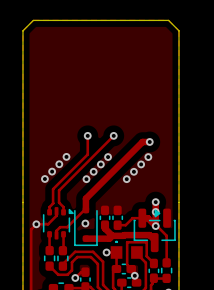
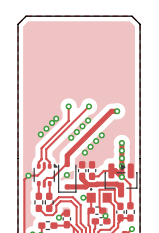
via: none -> (56, 118)
via: none -> (88, 120)
via: (108, 157) -> none
via: (148, 157) -> none
via: none -> (82, 126)
via: (100, 164) -> none
via: (141, 164) -> none
via: none -> (76, 132)
via: (93, 171) -> none
via: (133, 171) -> none
via: none -> (101, 135)
via: none -> (71, 137)
via: (44, 178) -> none
via: (86, 179) -> none
via: (126, 179) -> none
via: none -> (96, 141)
via: none -> (121, 143)
via: none -> (90, 146)
via: none -> (121, 150)
via: none -> (84, 152)

